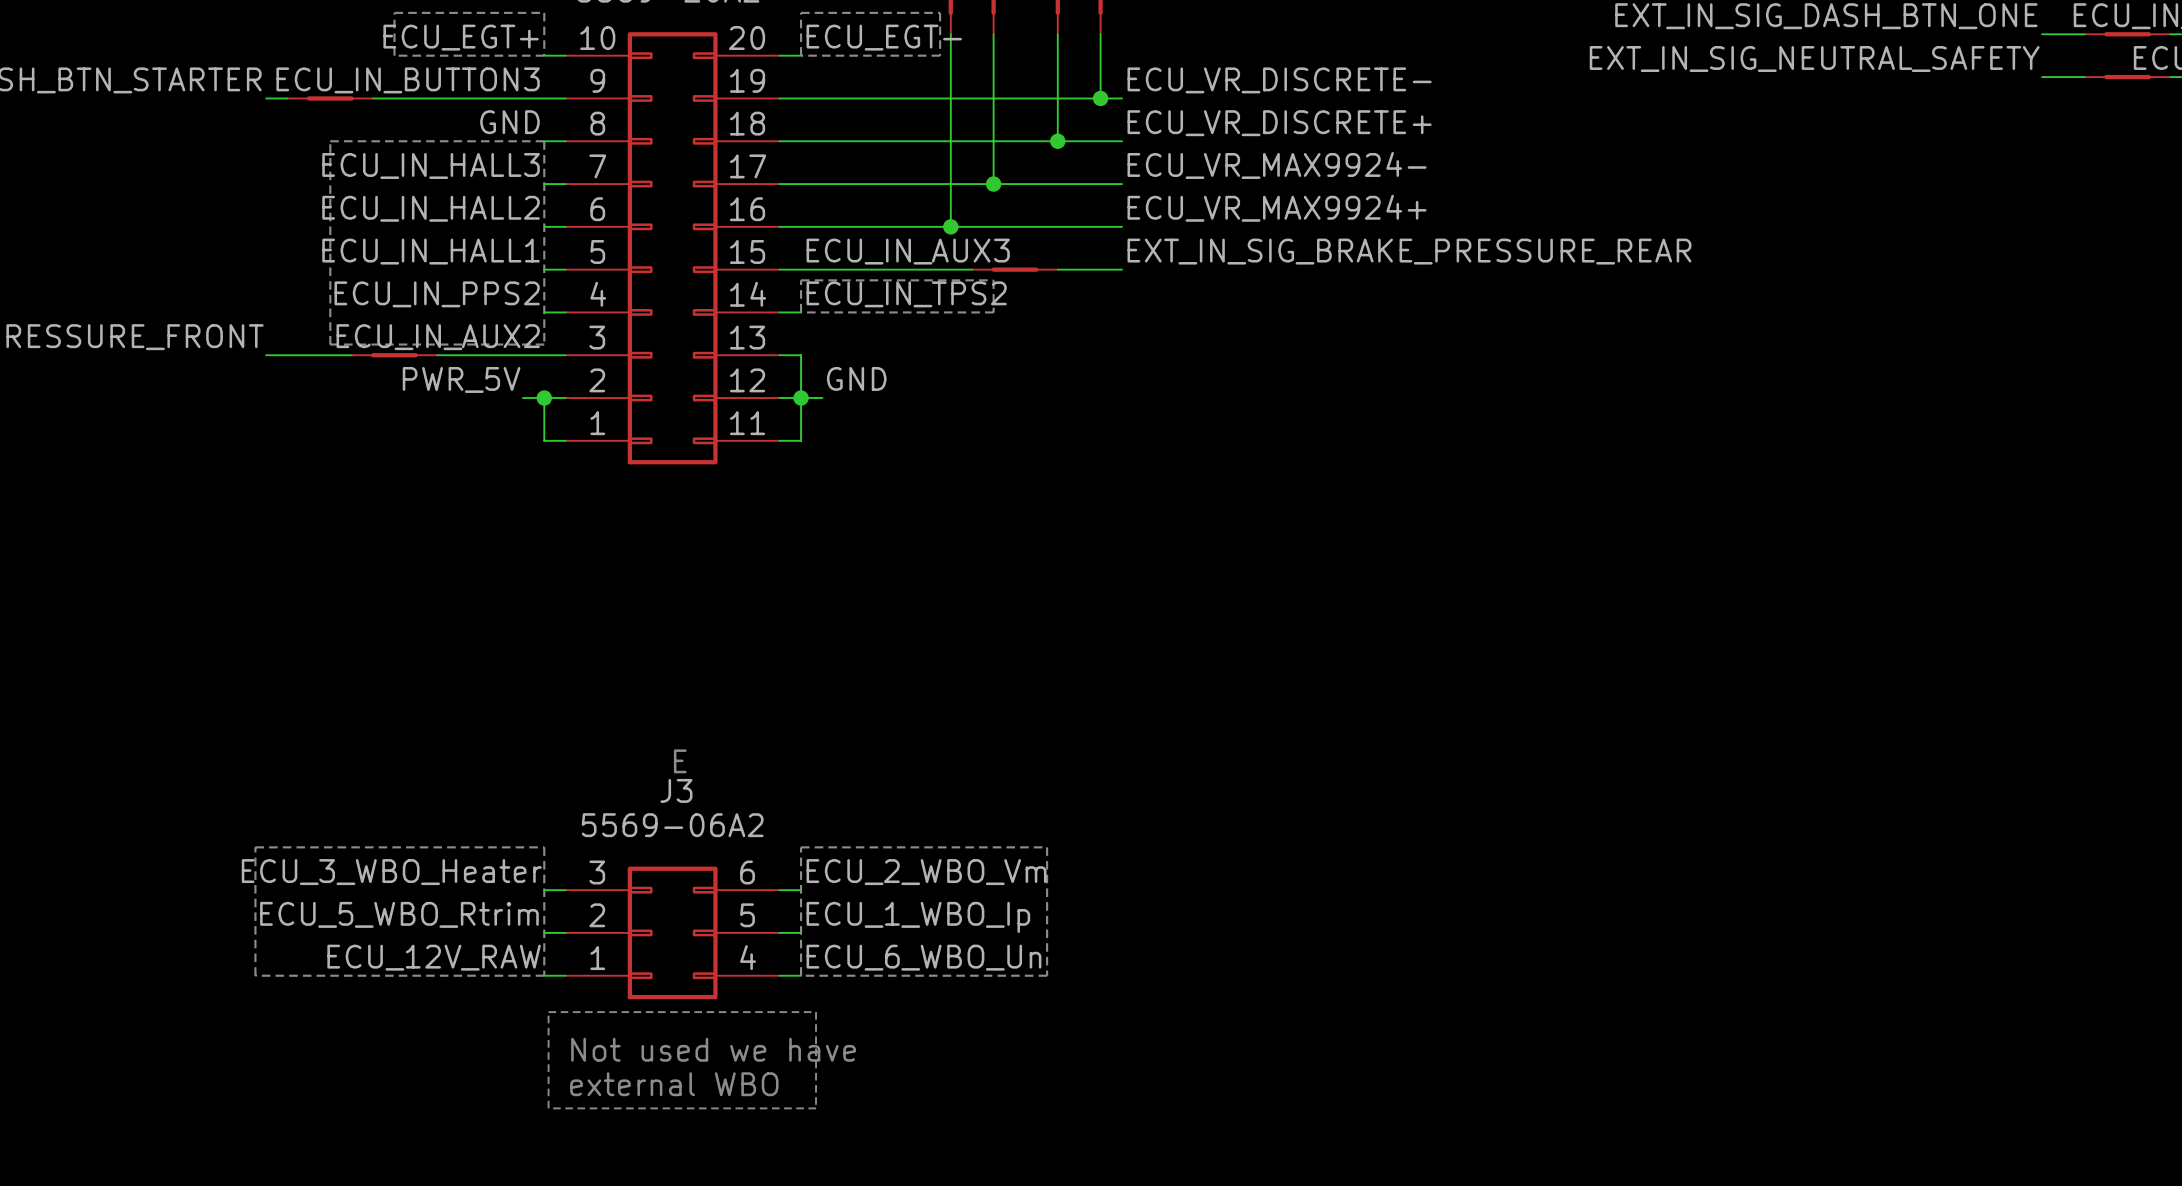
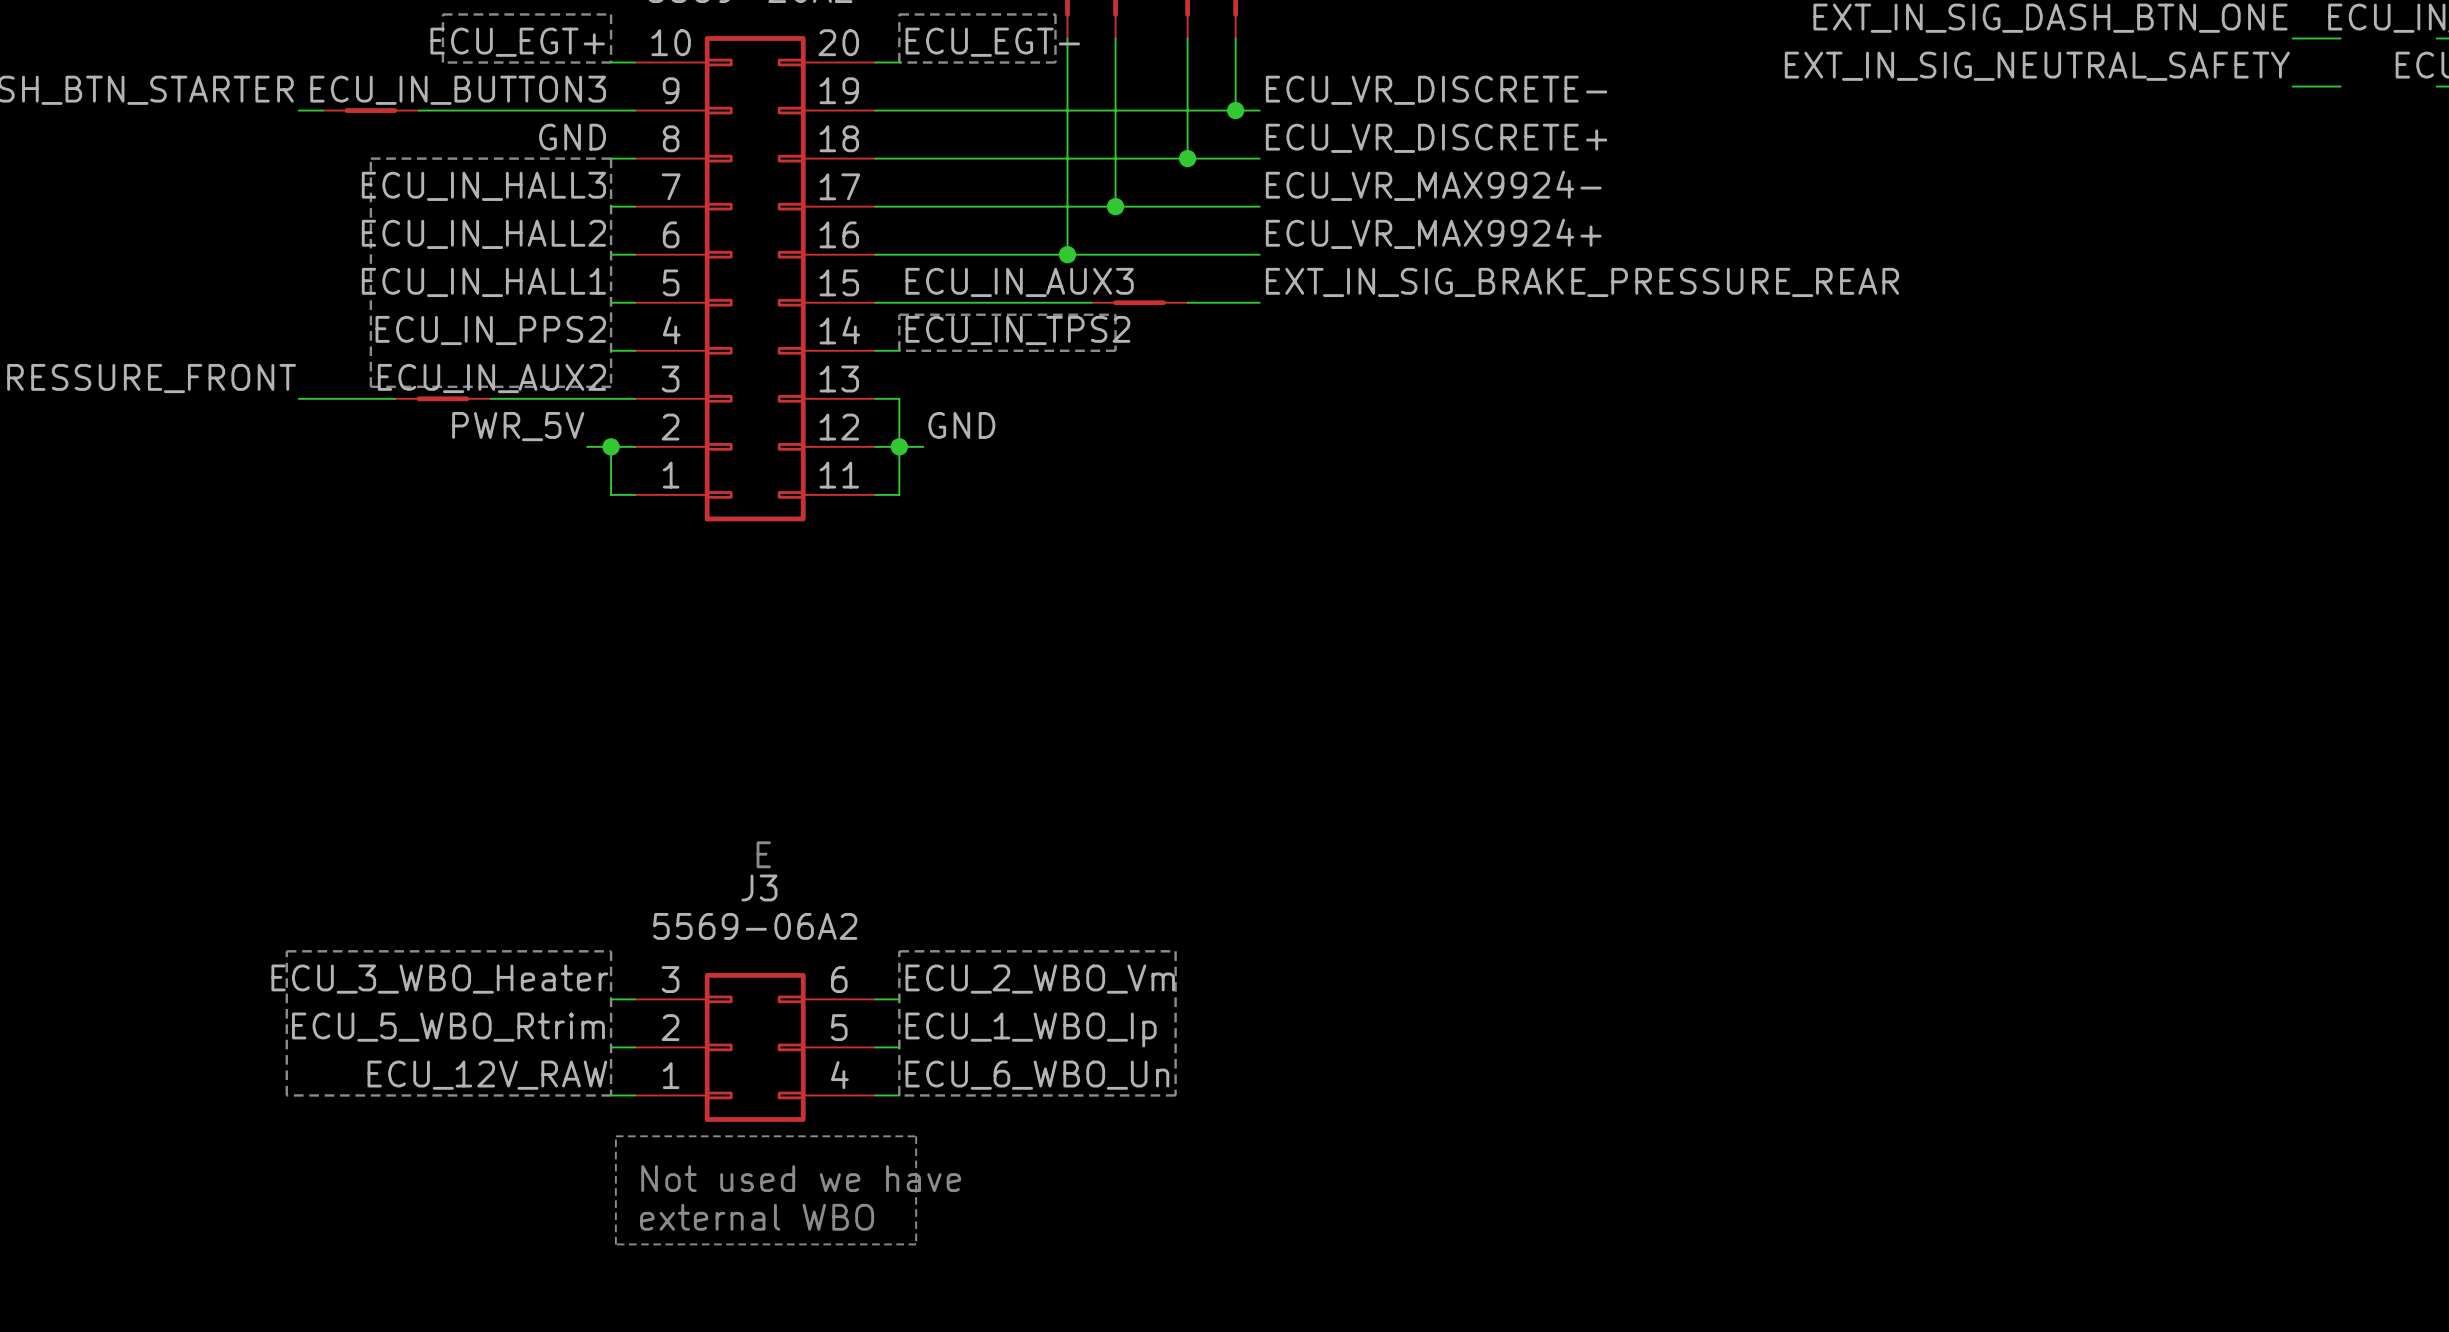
part: (2127, 34) -> none
part: (2127, 77) -> none

